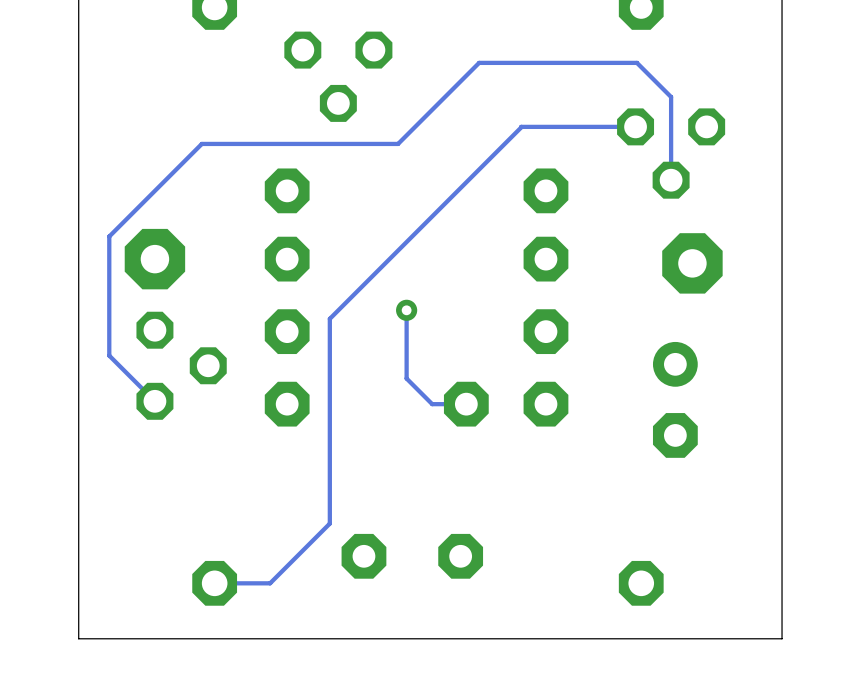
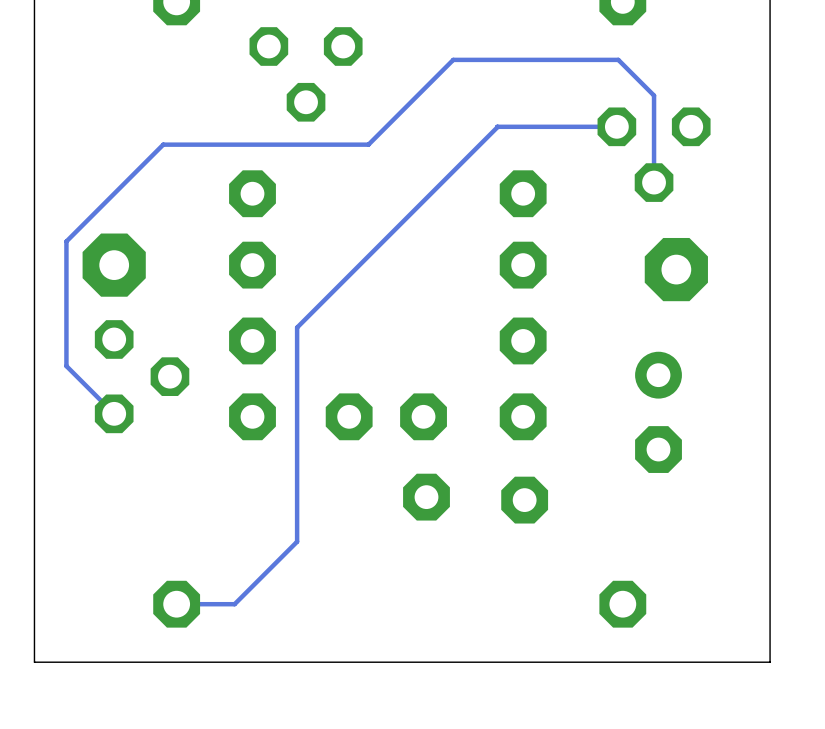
track: (406, 310) (406, 378) (432, 404) (466, 404) -> none
via: (406, 310) -> none
part: none -> (386, 416)
part: (466, 404) -> none
part: none -> (426, 497)
part: none -> (524, 500)
part: (363, 556) -> none
part: (460, 556) -> none

